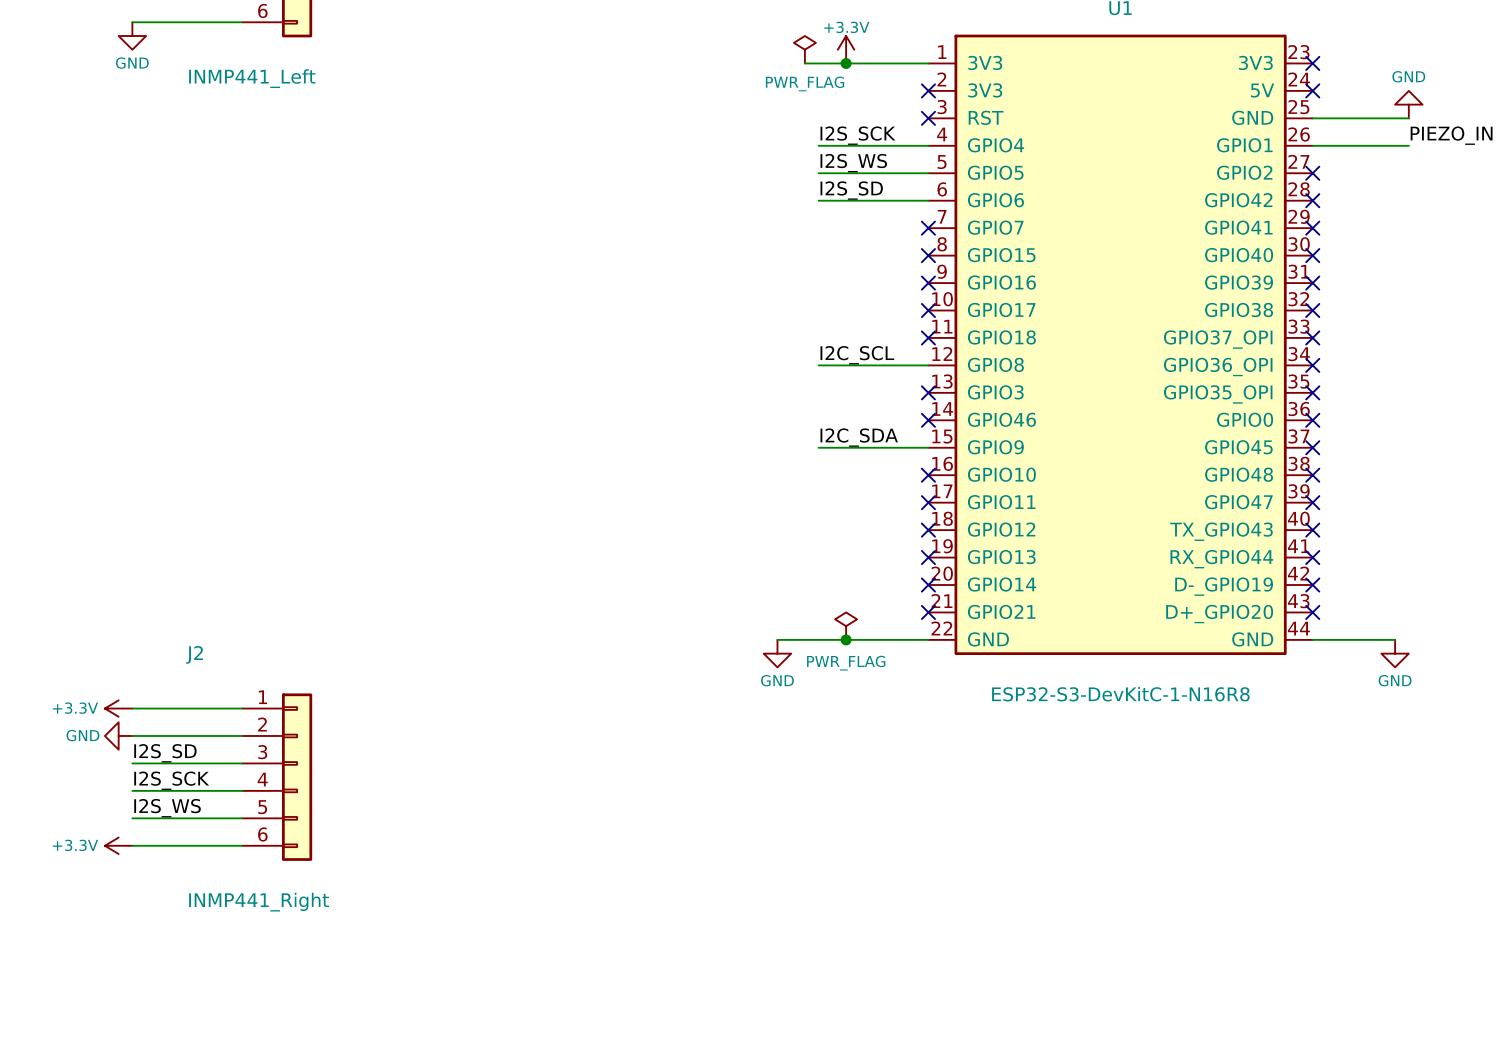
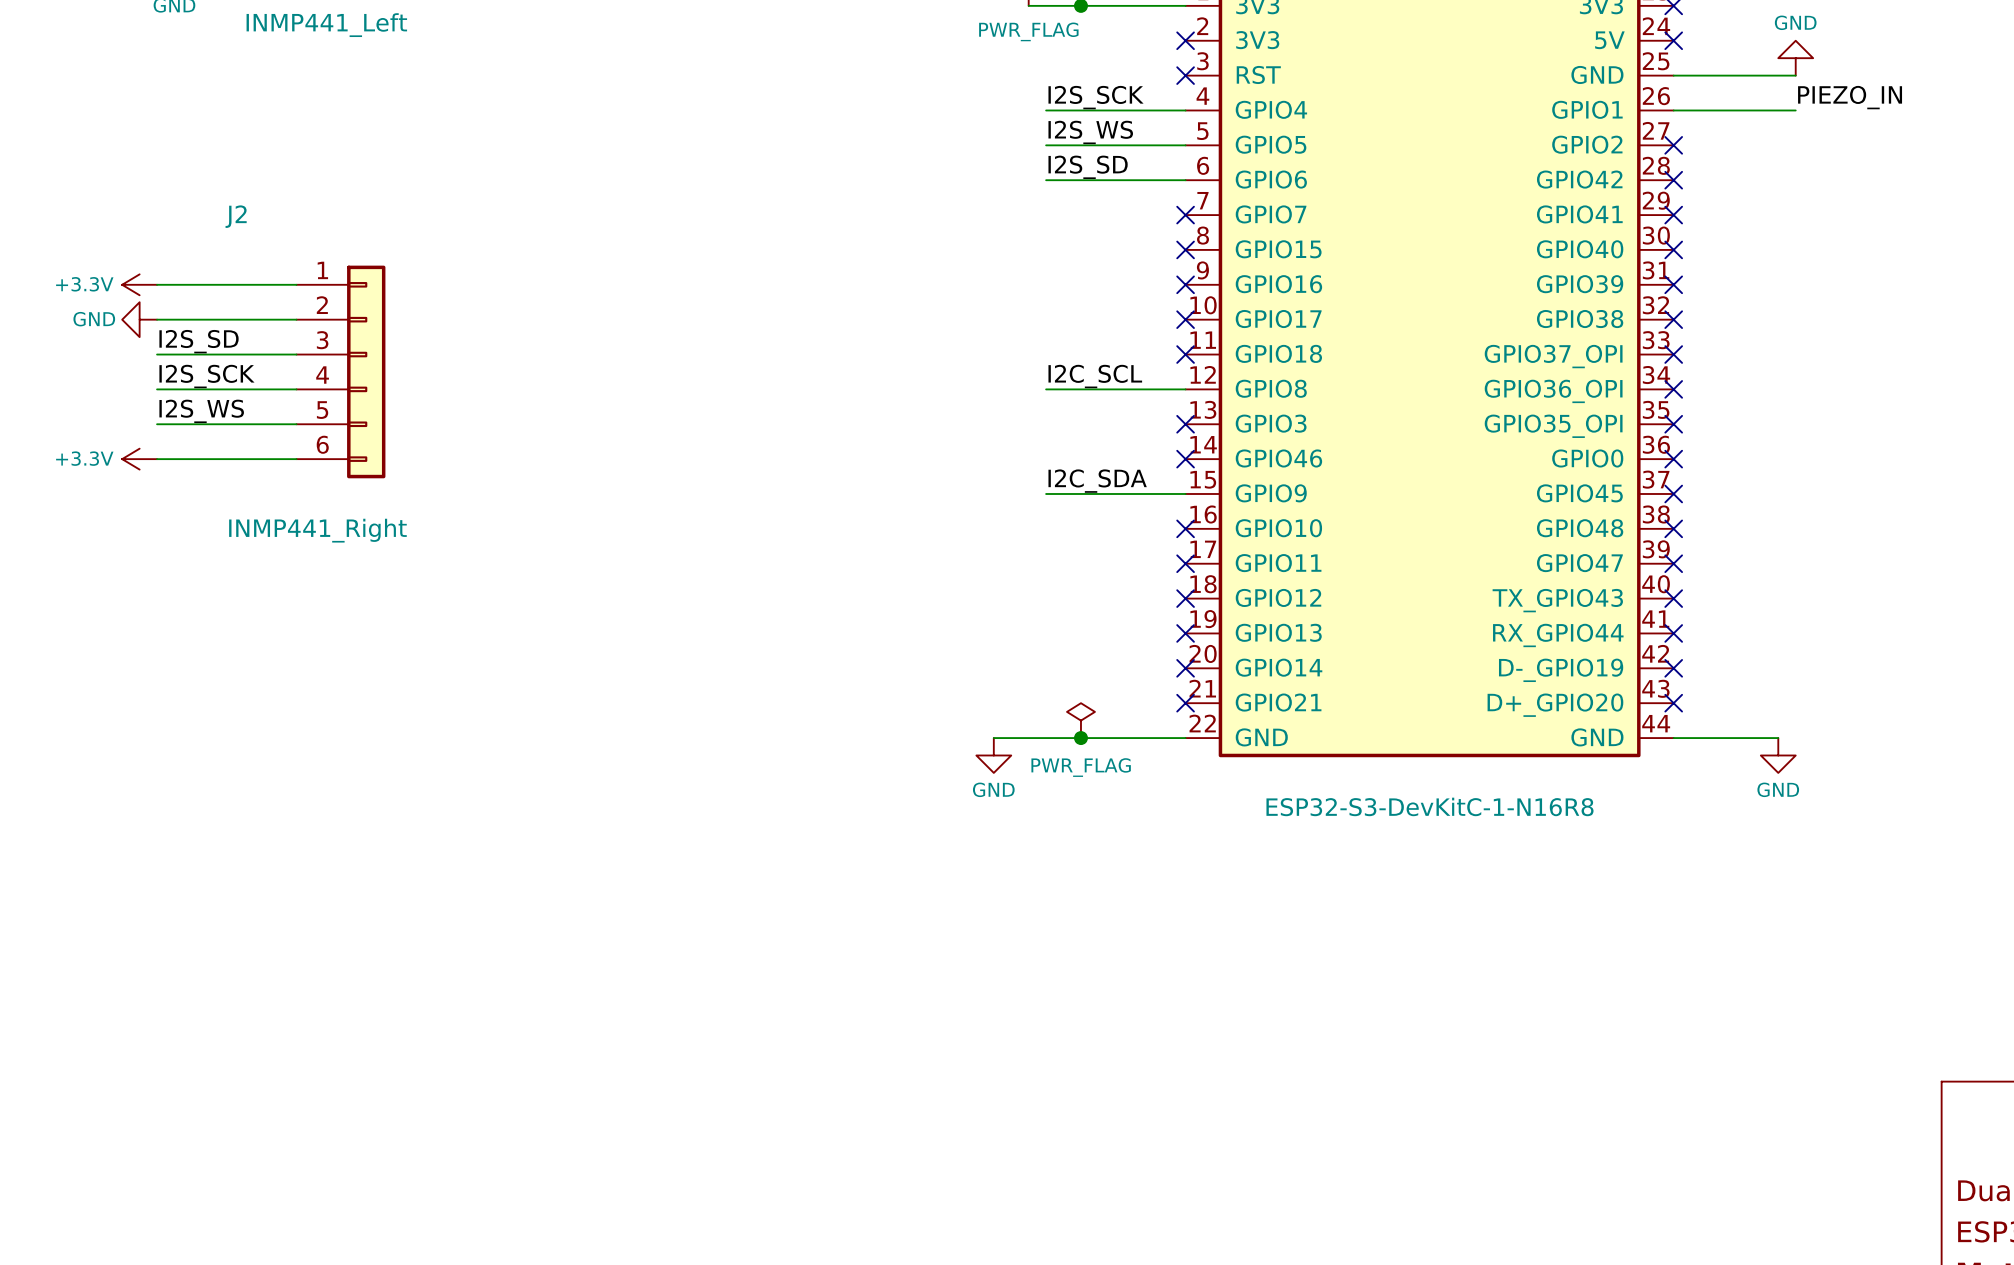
power symbol: none -> +3.3V (139, 284)
wire: none -> (157, 284) (296, 284)
power symbol: none -> GND (139, 319)
wire: none -> (157, 319) (296, 319)
label: none -> I2S_SD (199, 341)
wire: none -> (157, 354) (296, 354)
label: none -> I2S_SCK (206, 376)
wire: none -> (157, 389) (296, 389)
label: none -> I2S_WS (201, 411)
wire: none -> (157, 424) (296, 424)
power symbol: none -> +3.3V (139, 459)
wire: none -> (157, 459) (296, 459)
power symbol: +3.3V (118, 708) -> none
wire: (132, 708) (242, 708) -> none
power symbol: GND (118, 735) -> none
wire: (132, 735) (242, 735) -> none
label: I2S_SD (165, 753) -> none
wire: (132, 763) (242, 763) -> none
J2 position: (277, 777) -> (340, 371)
label: I2S_SCK (171, 780) -> none
wire: (132, 790) (242, 790) -> none
label: I2S_WS (167, 808) -> none
wire: (132, 818) (242, 818) -> none
power symbol: +3.3V (118, 845) -> none
wire: (132, 845) (242, 845) -> none

